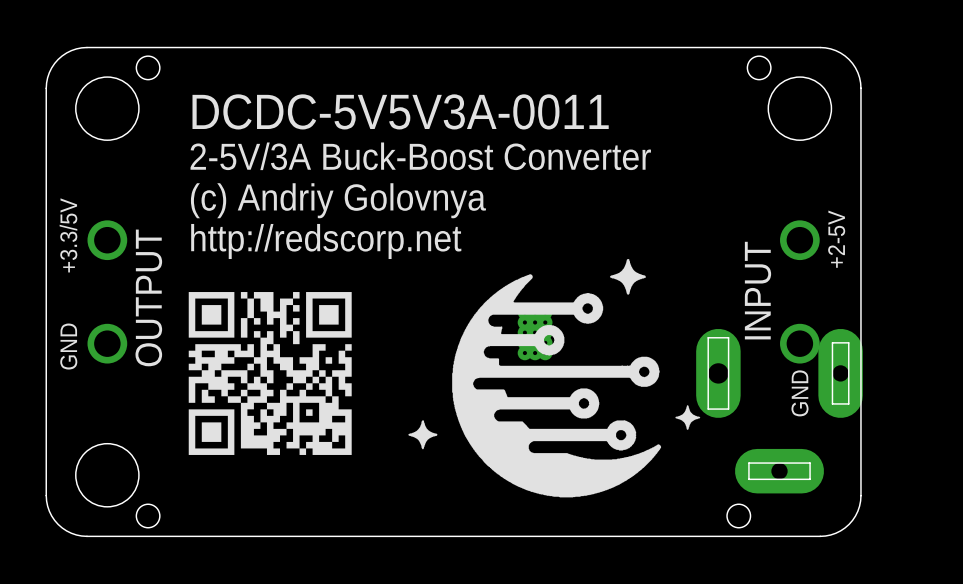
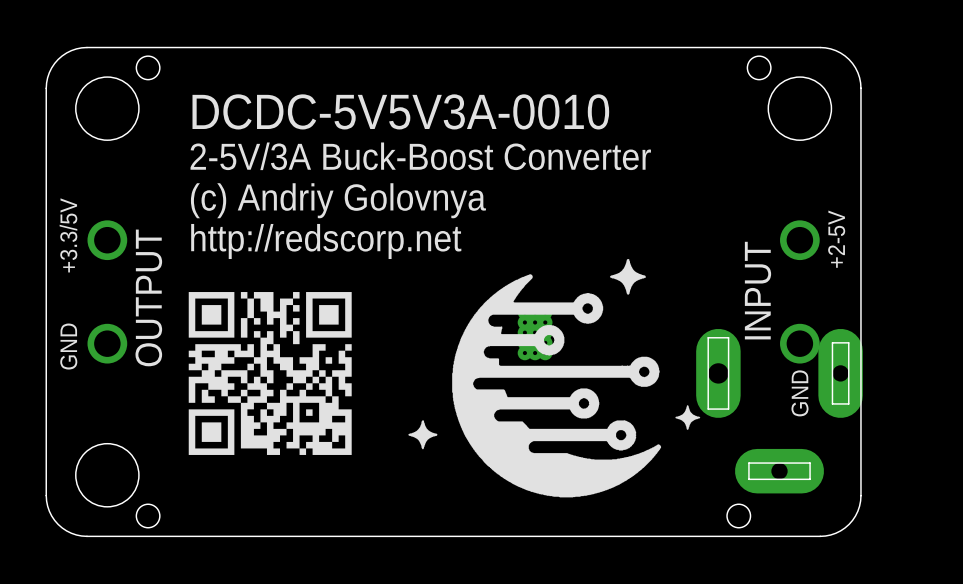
text: DCDC-5V5V3A-0011 (400, 111) -> DCDC-5V5V3A-0010 (400, 111)

